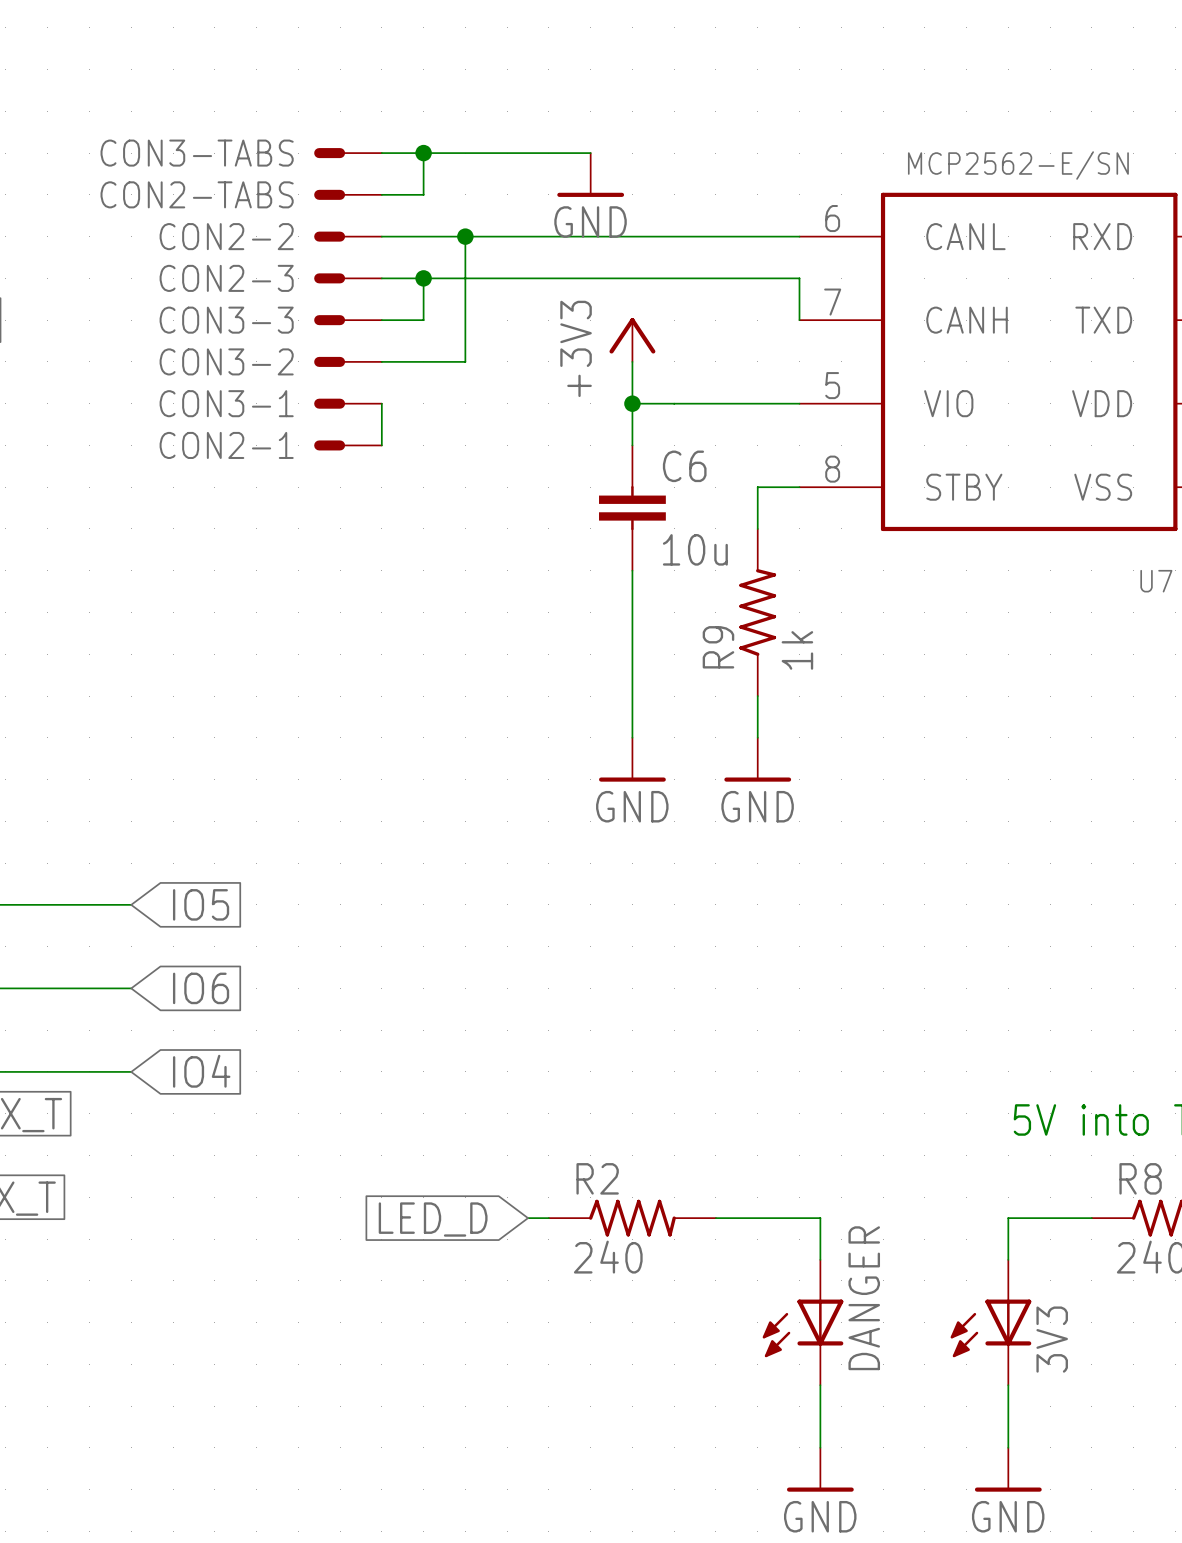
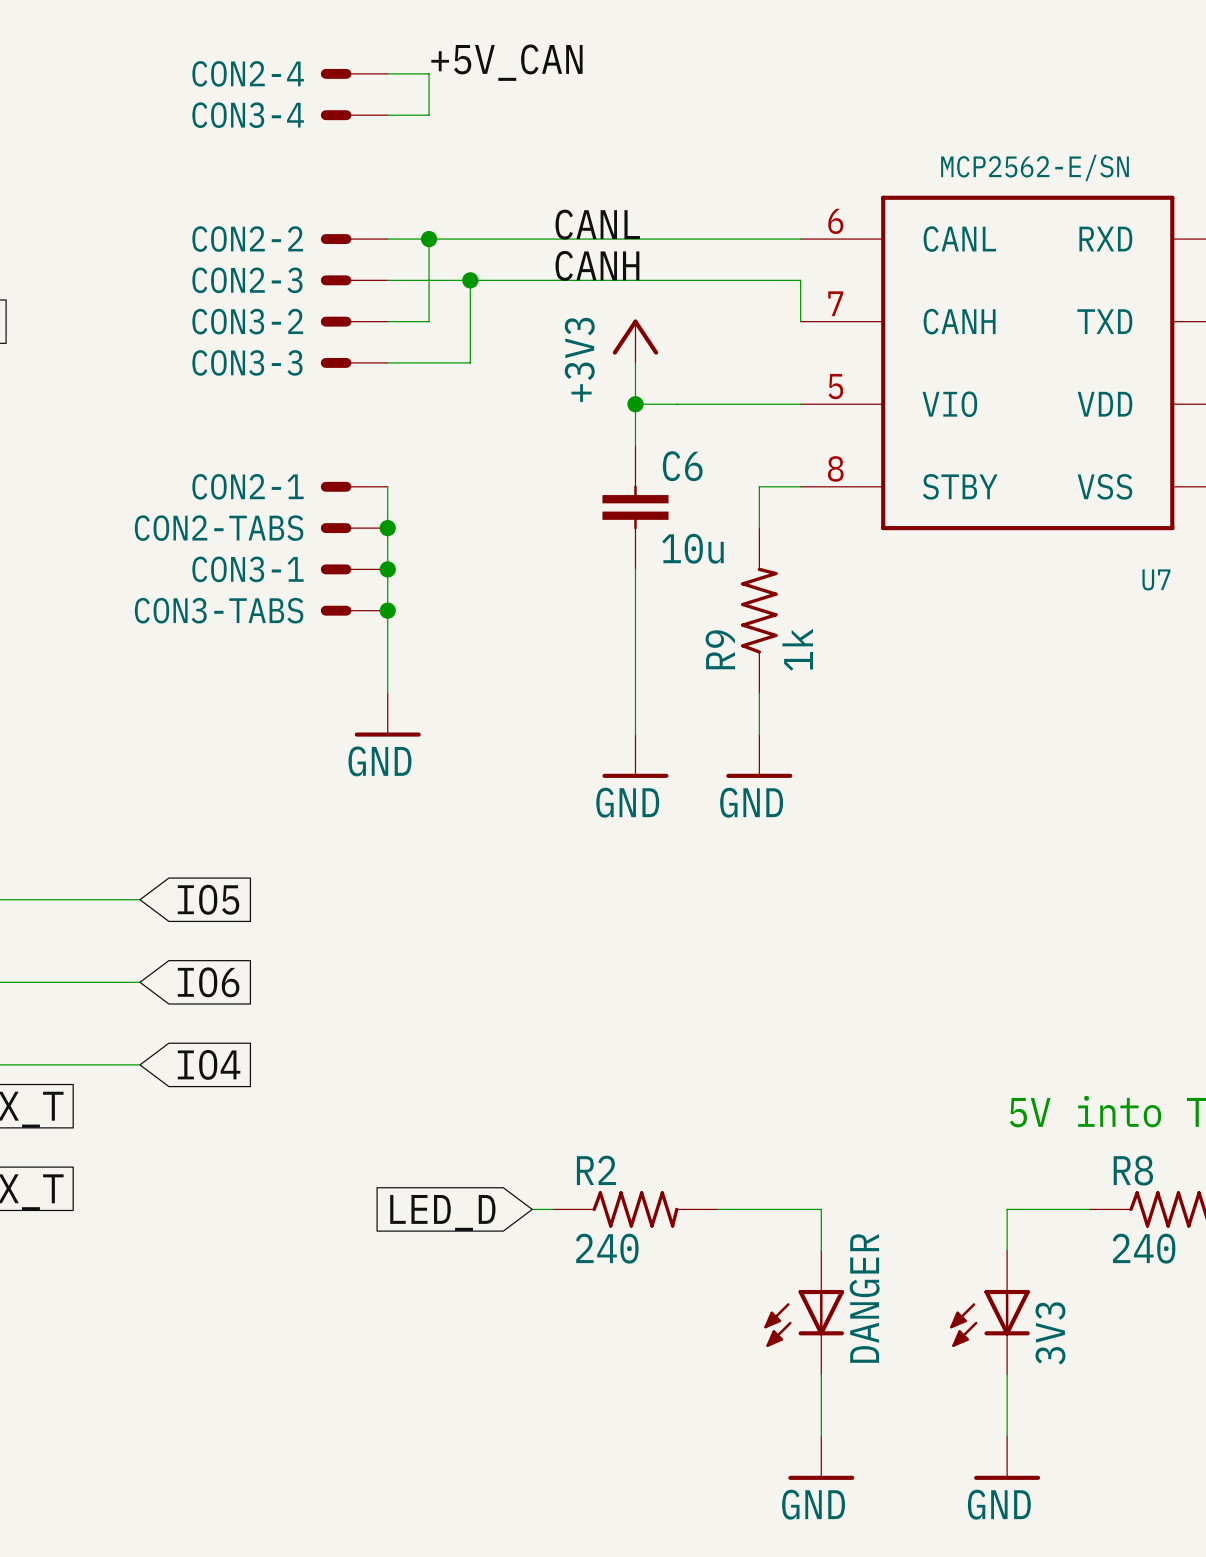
label: none -> +5V_CAN (506, 62)
CON2-4: none -> (354, 73)
wire: none -> (387, 73) (429, 73) (429, 115) (387, 115)
CON3-4: none -> (354, 115)
CON3-TABS position: (348, 153) -> (354, 610)
wire: (381, 153) (590, 153) -> none
wire: (423, 153) (423, 194) (381, 194) -> none
junction: (423, 153) -> none
power symbol: GND (590, 175) -> none
CON2-TABS position: (348, 194) -> (354, 528)
label: none -> CANL (597, 224)
junction: none -> (429, 239)
wire: (465, 236) (465, 278) -> (429, 239) (429, 280)
junction: (465, 236) -> none
label: none -> CANH (597, 265)
junction: (423, 278) -> none
junction: none -> (470, 280)
CON3-3 name: CON3-3 (226, 320) -> CON3-2 (247, 321)
CON3-2 name: CON3-2 (226, 361) -> CON3-3 (247, 362)
CON3-1 position: (348, 403) -> (354, 569)
wire: (381, 403) (381, 445) -> none
CON2-1 position: (348, 445) -> (354, 486)
wire: none -> (387, 486) (387, 693)
junction: none -> (387, 528)
junction: none -> (387, 569)
junction: none -> (387, 610)
power symbol: none -> GND (387, 714)

